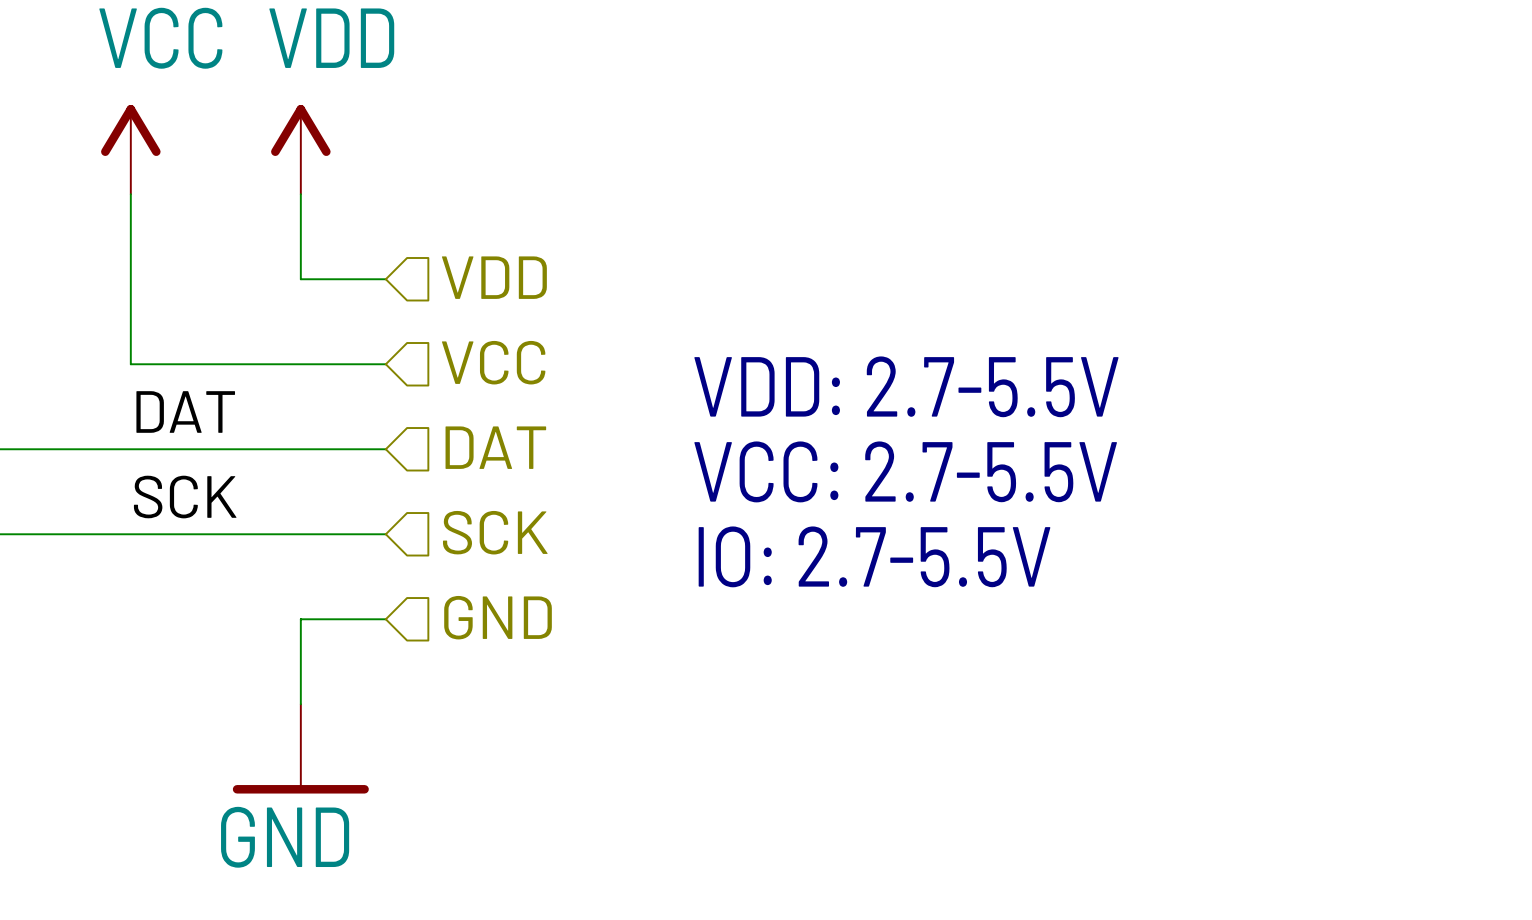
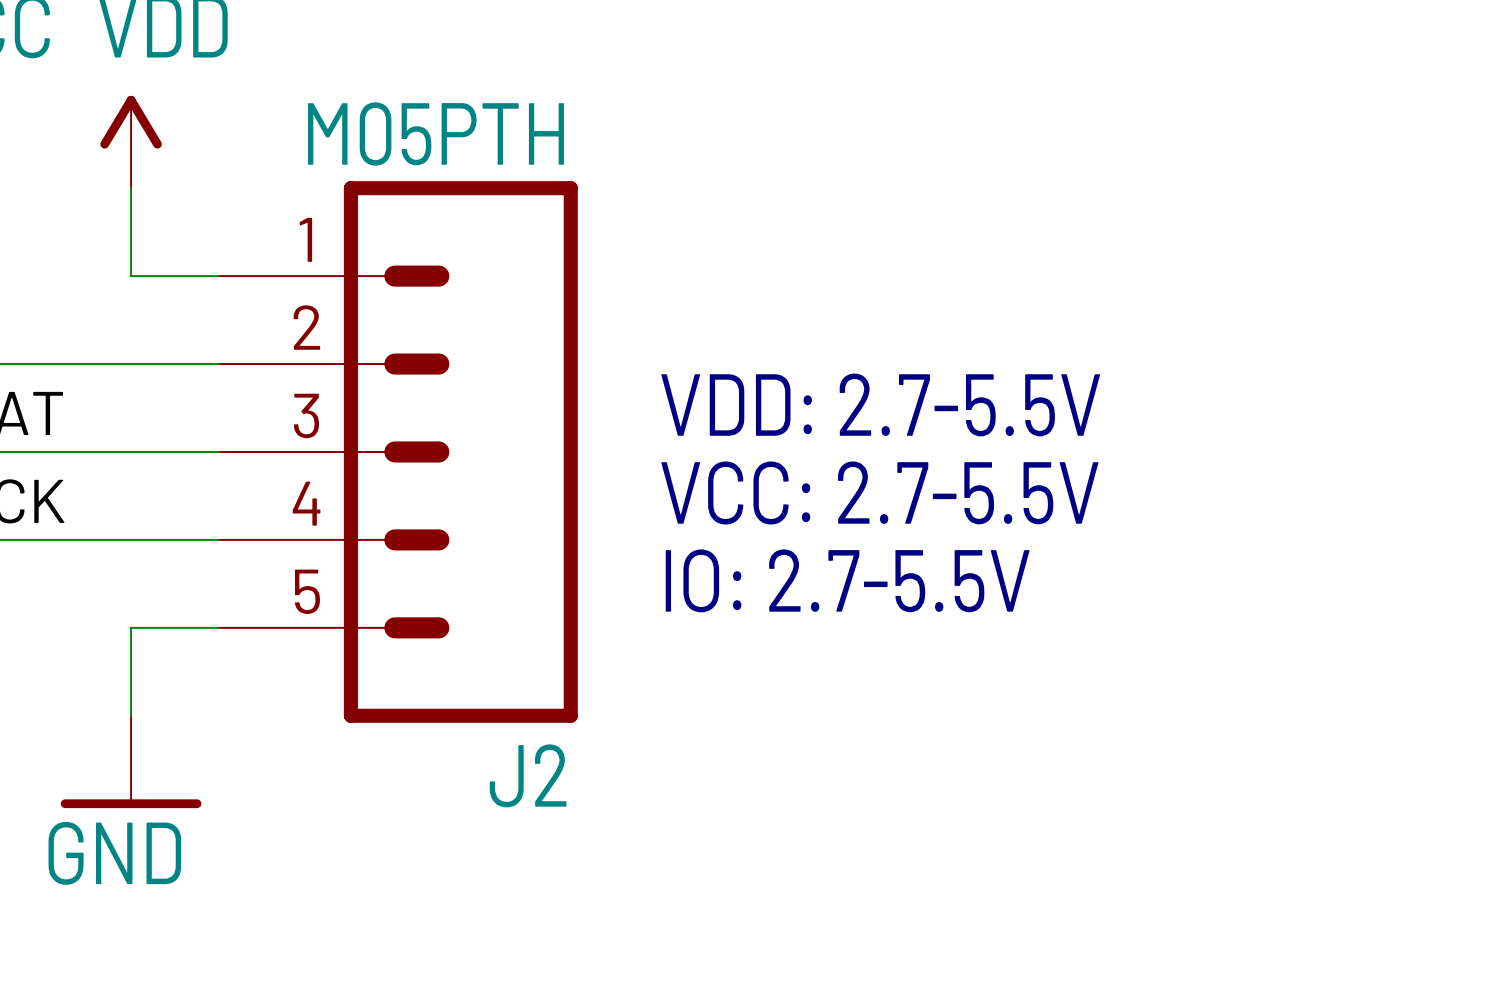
hierarchical label: VDD (494, 277) -> none
hierarchical label: VCC (493, 362) -> none
text position: VDD: 2.7-5.5V (906, 386) -> VDD: 2.7-5.5V (880, 404)
hierarchical label: DAT (495, 447) -> none
J2: none -> M05PTH (398, 451)
text position: VCC: 2.7-5.5V (905, 471) -> VCC: 2.7-5.5V (879, 493)
hierarchical label: SCK (495, 532) -> none
text position: IO: 2.7-5.5V (874, 556) -> IO: 2.7-5.5V (847, 580)
hierarchical label: GND (498, 617) -> none

